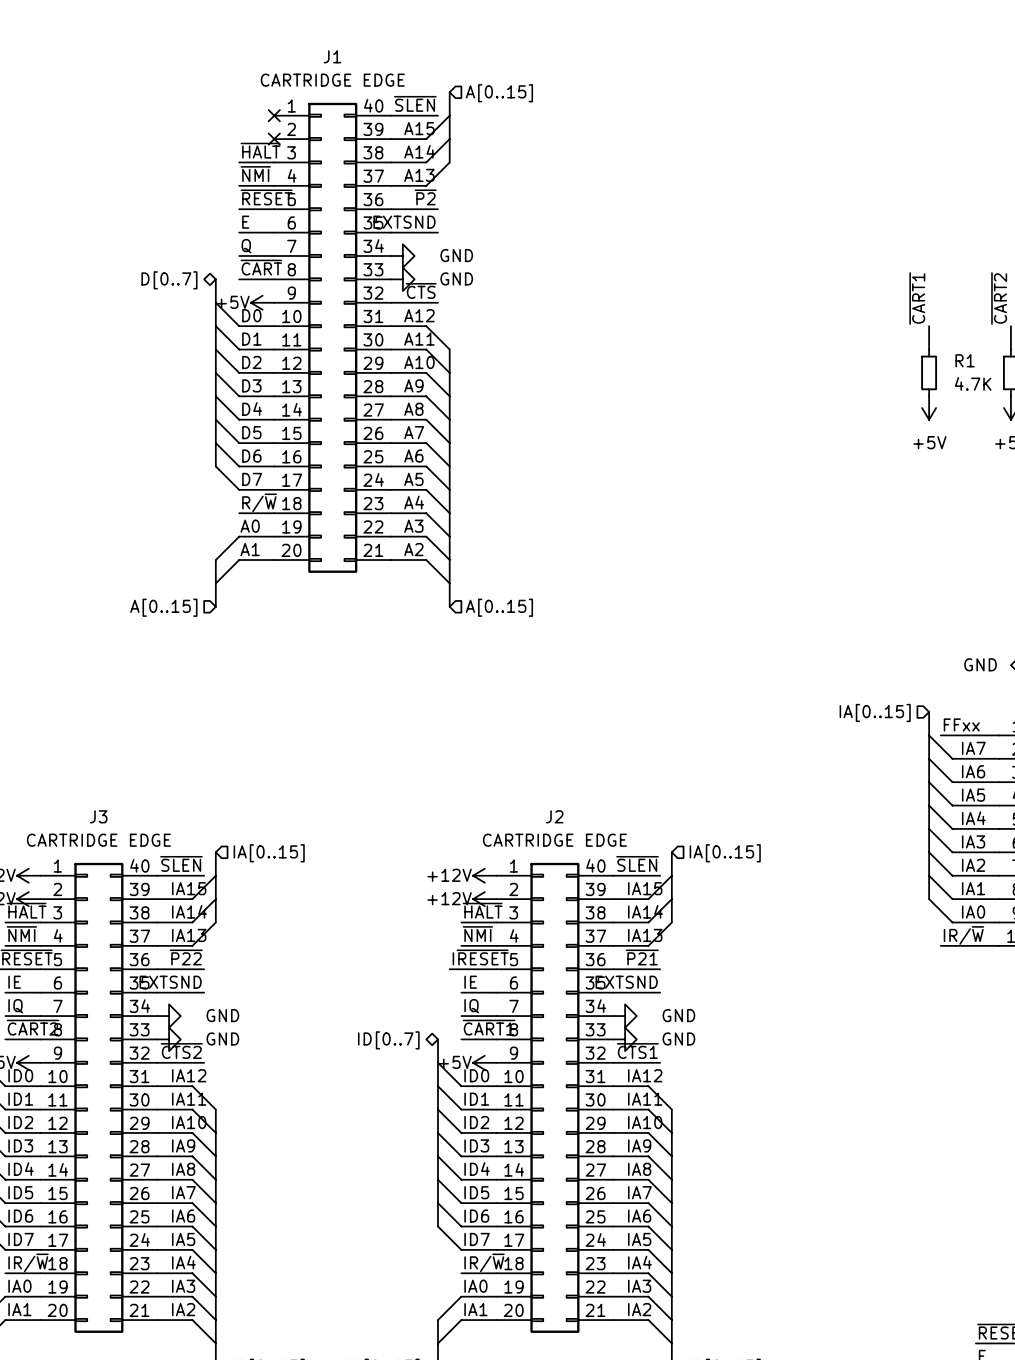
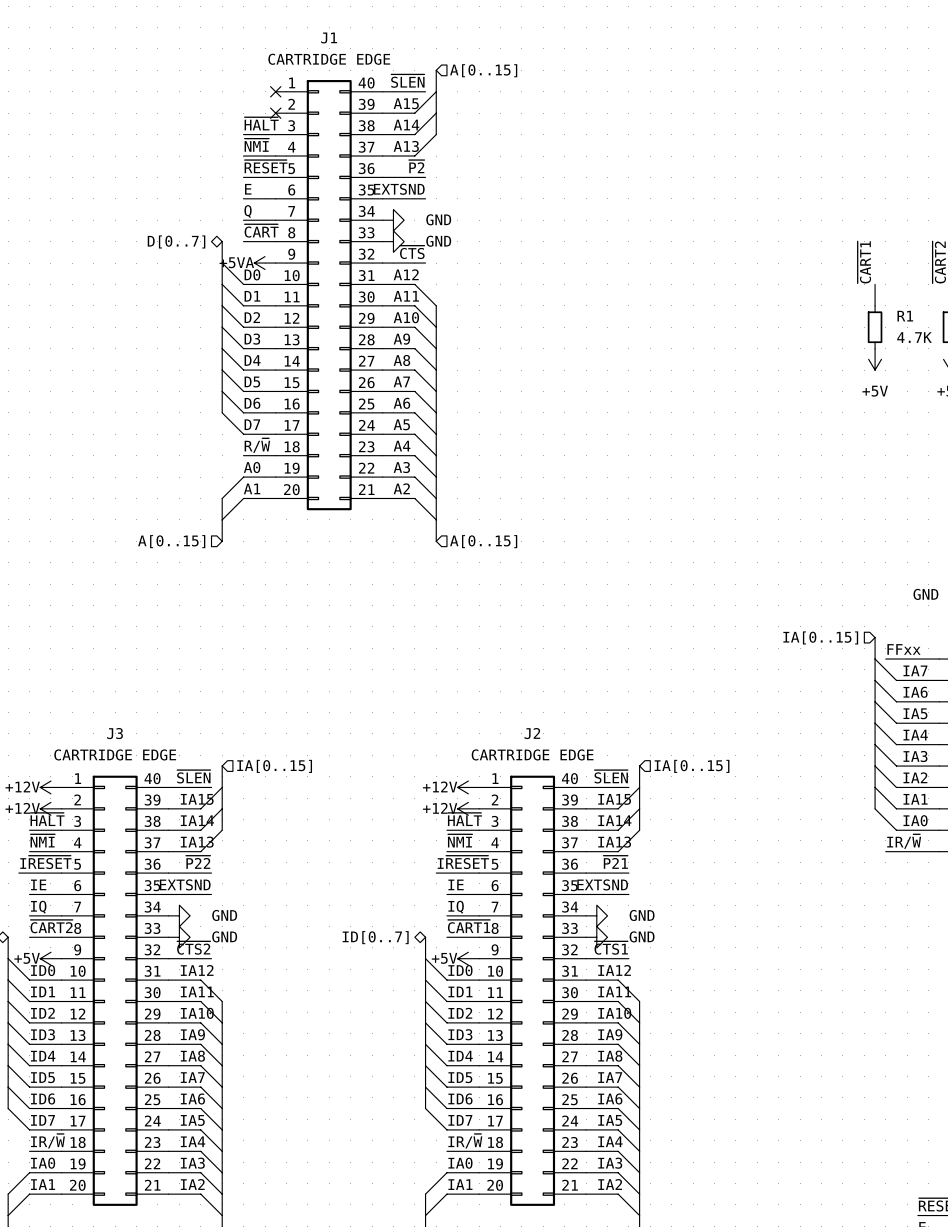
power symbol: +5V (262, 302) -> +5VA (265, 263)

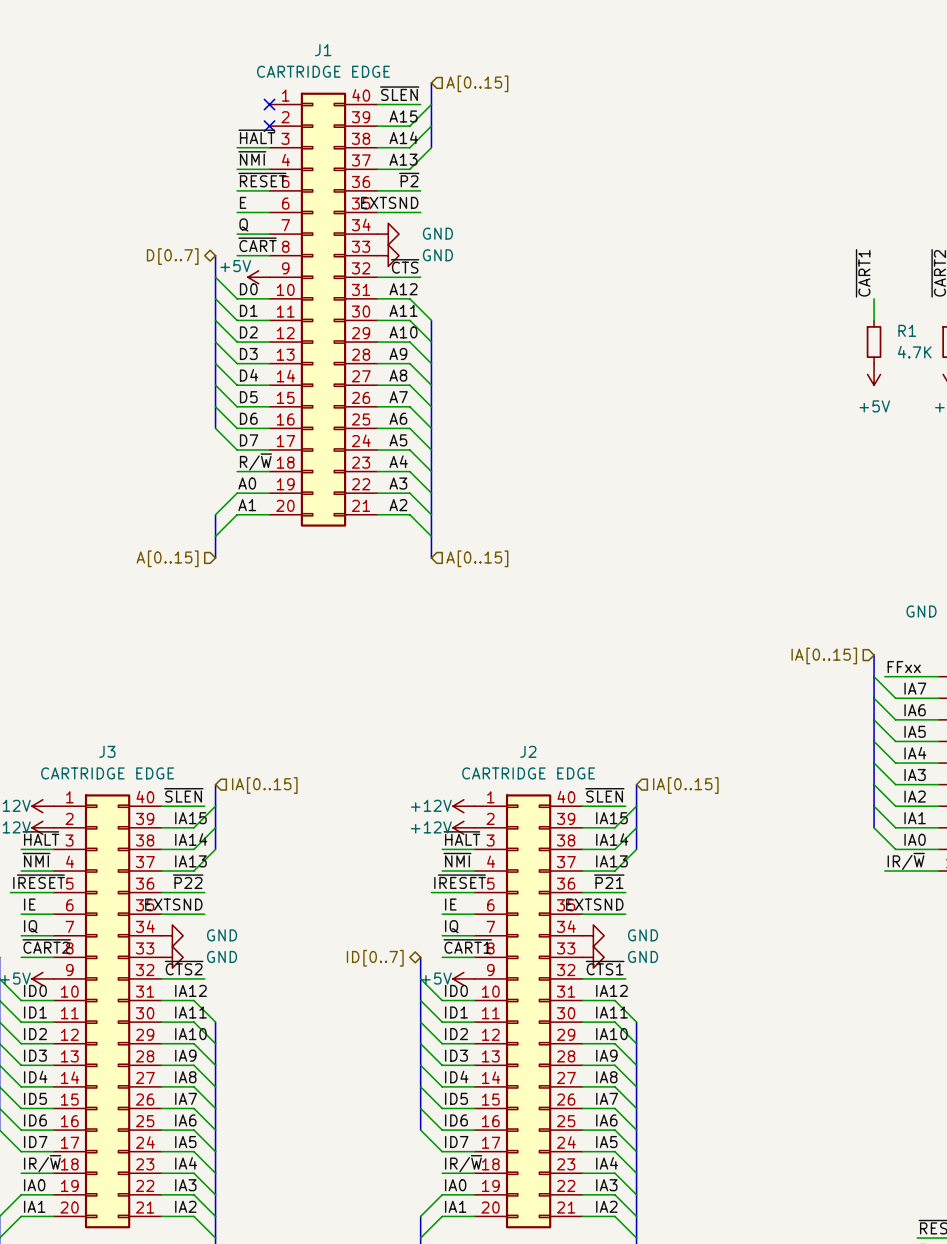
power symbol: +5VA (265, 263) -> +5V (258, 277)

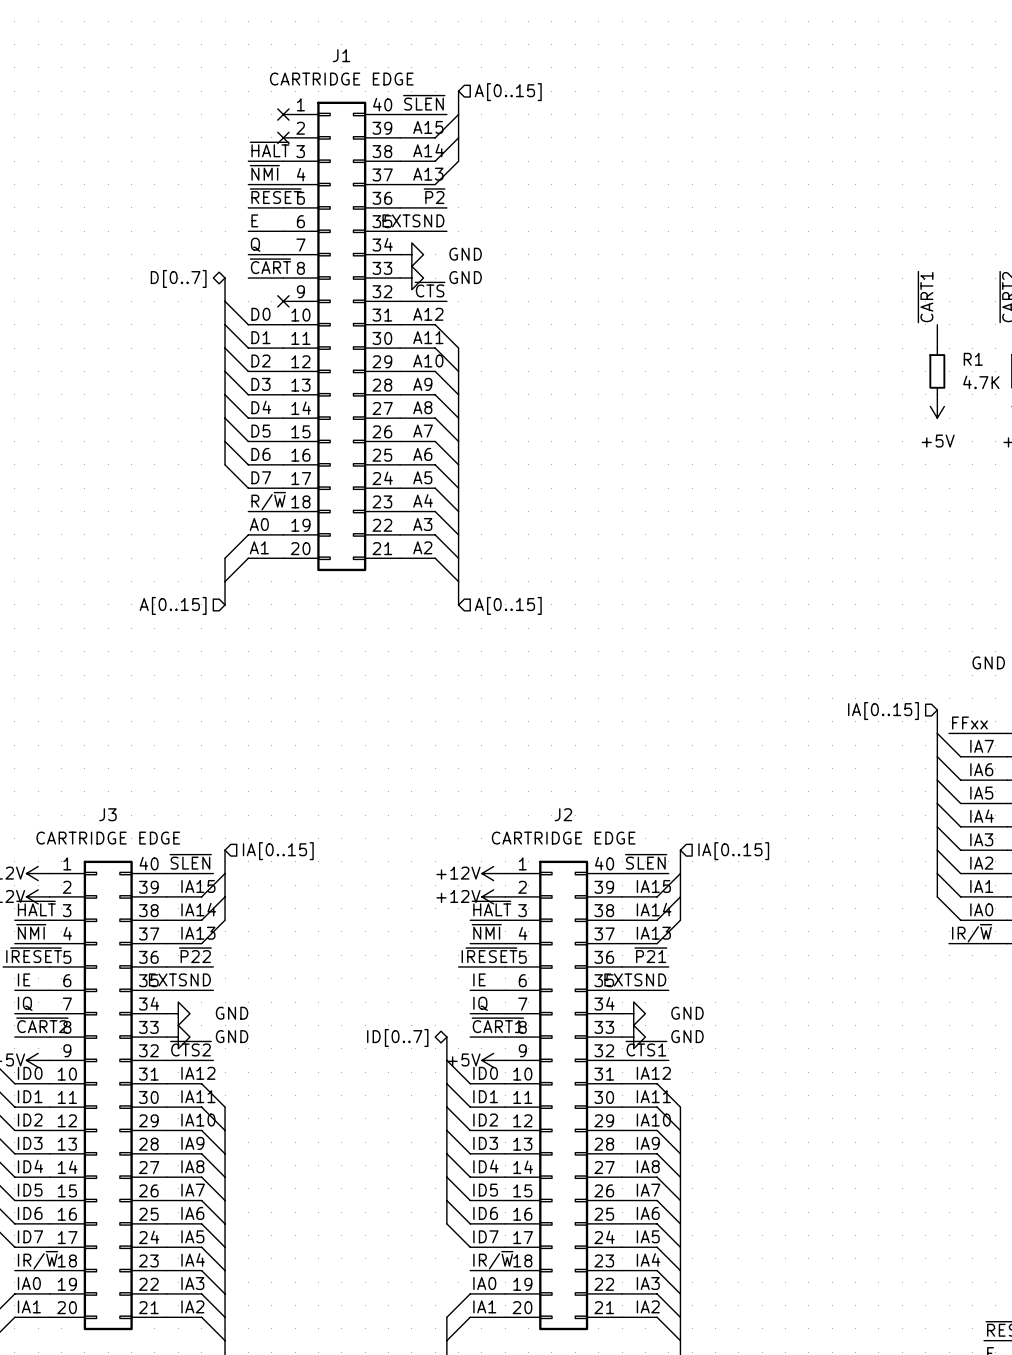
power symbol: +5V (258, 277) -> none
no-connect mark: none -> (283, 301)

